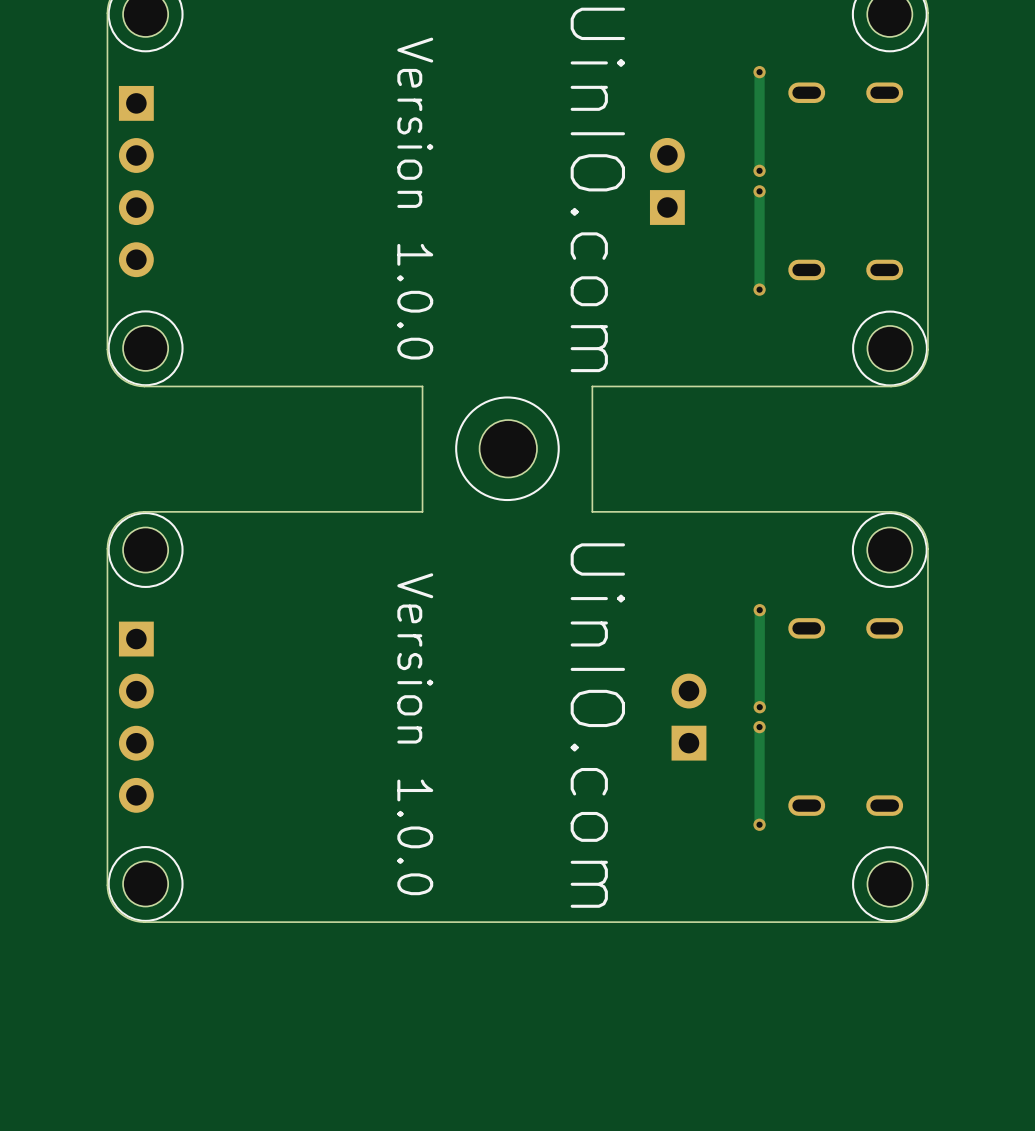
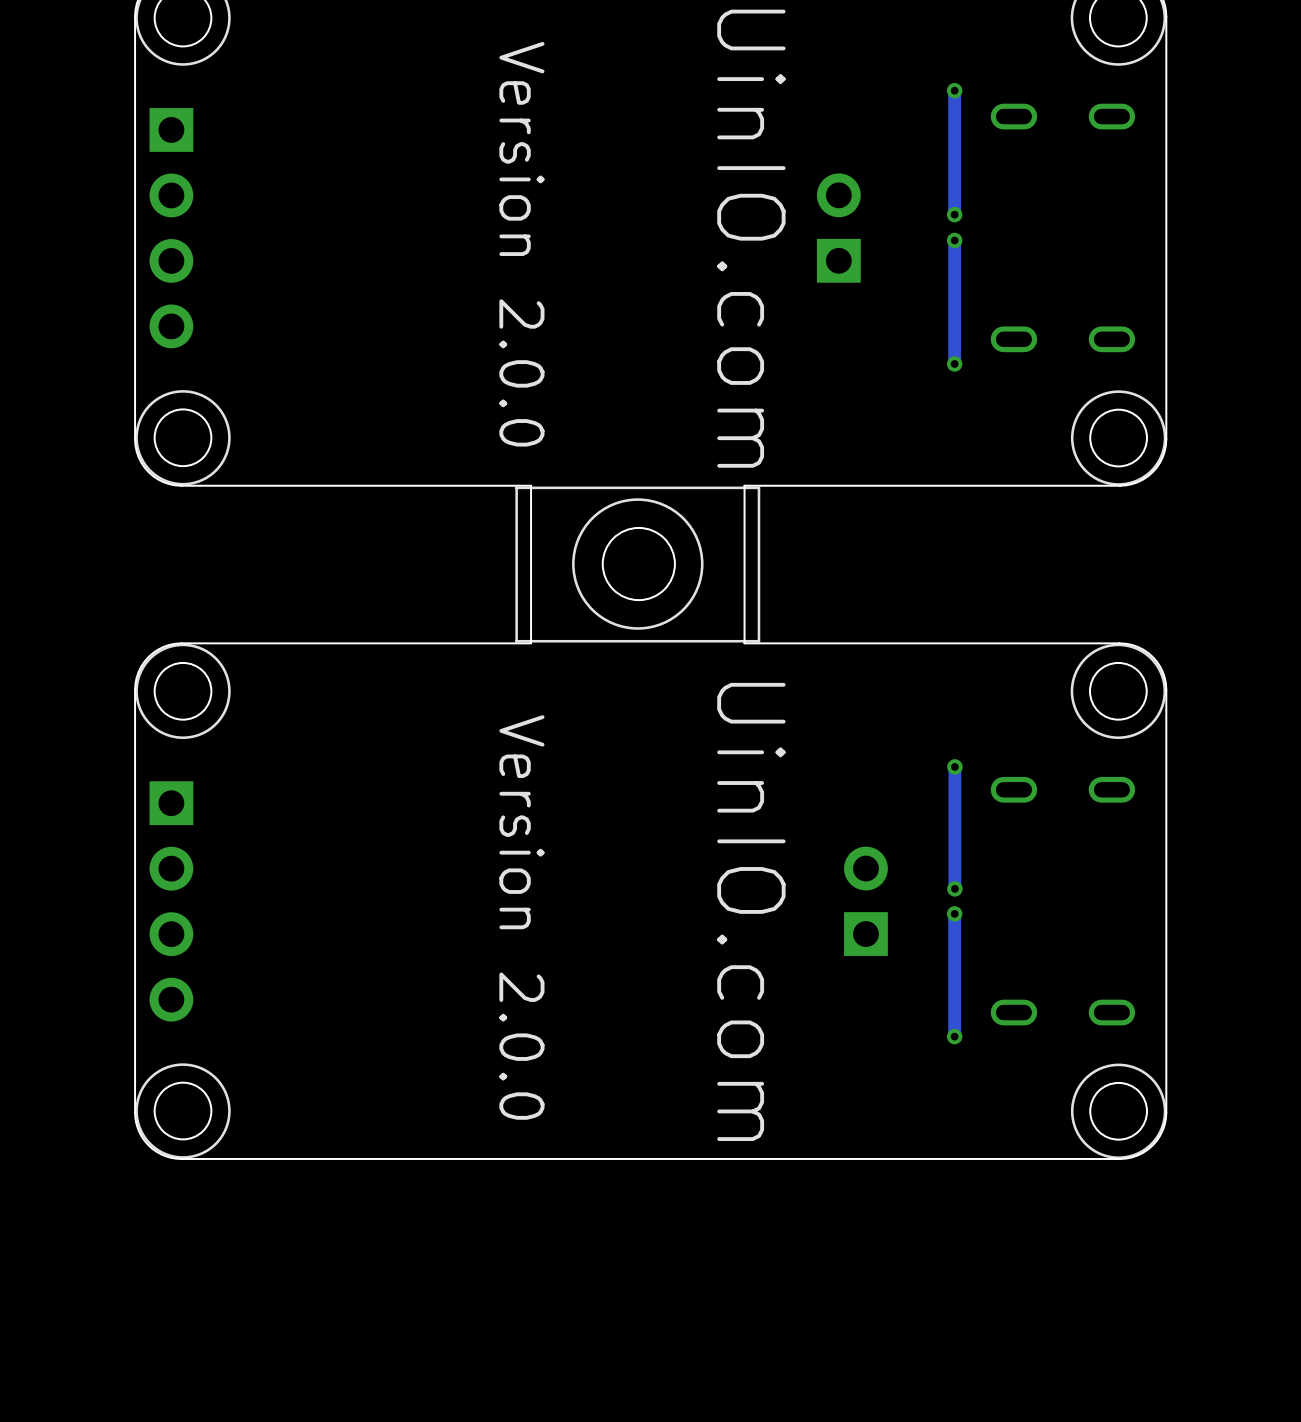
text: Version 1.0.0 (415, 198) -> Version 2.0.0 (521, 244)
line: none -> (758, 487) (516, 487) (516, 641) (758, 641) (758, 487)
text: Version 1.0.0 (415, 734) -> Version 2.0.0 (521, 917)

